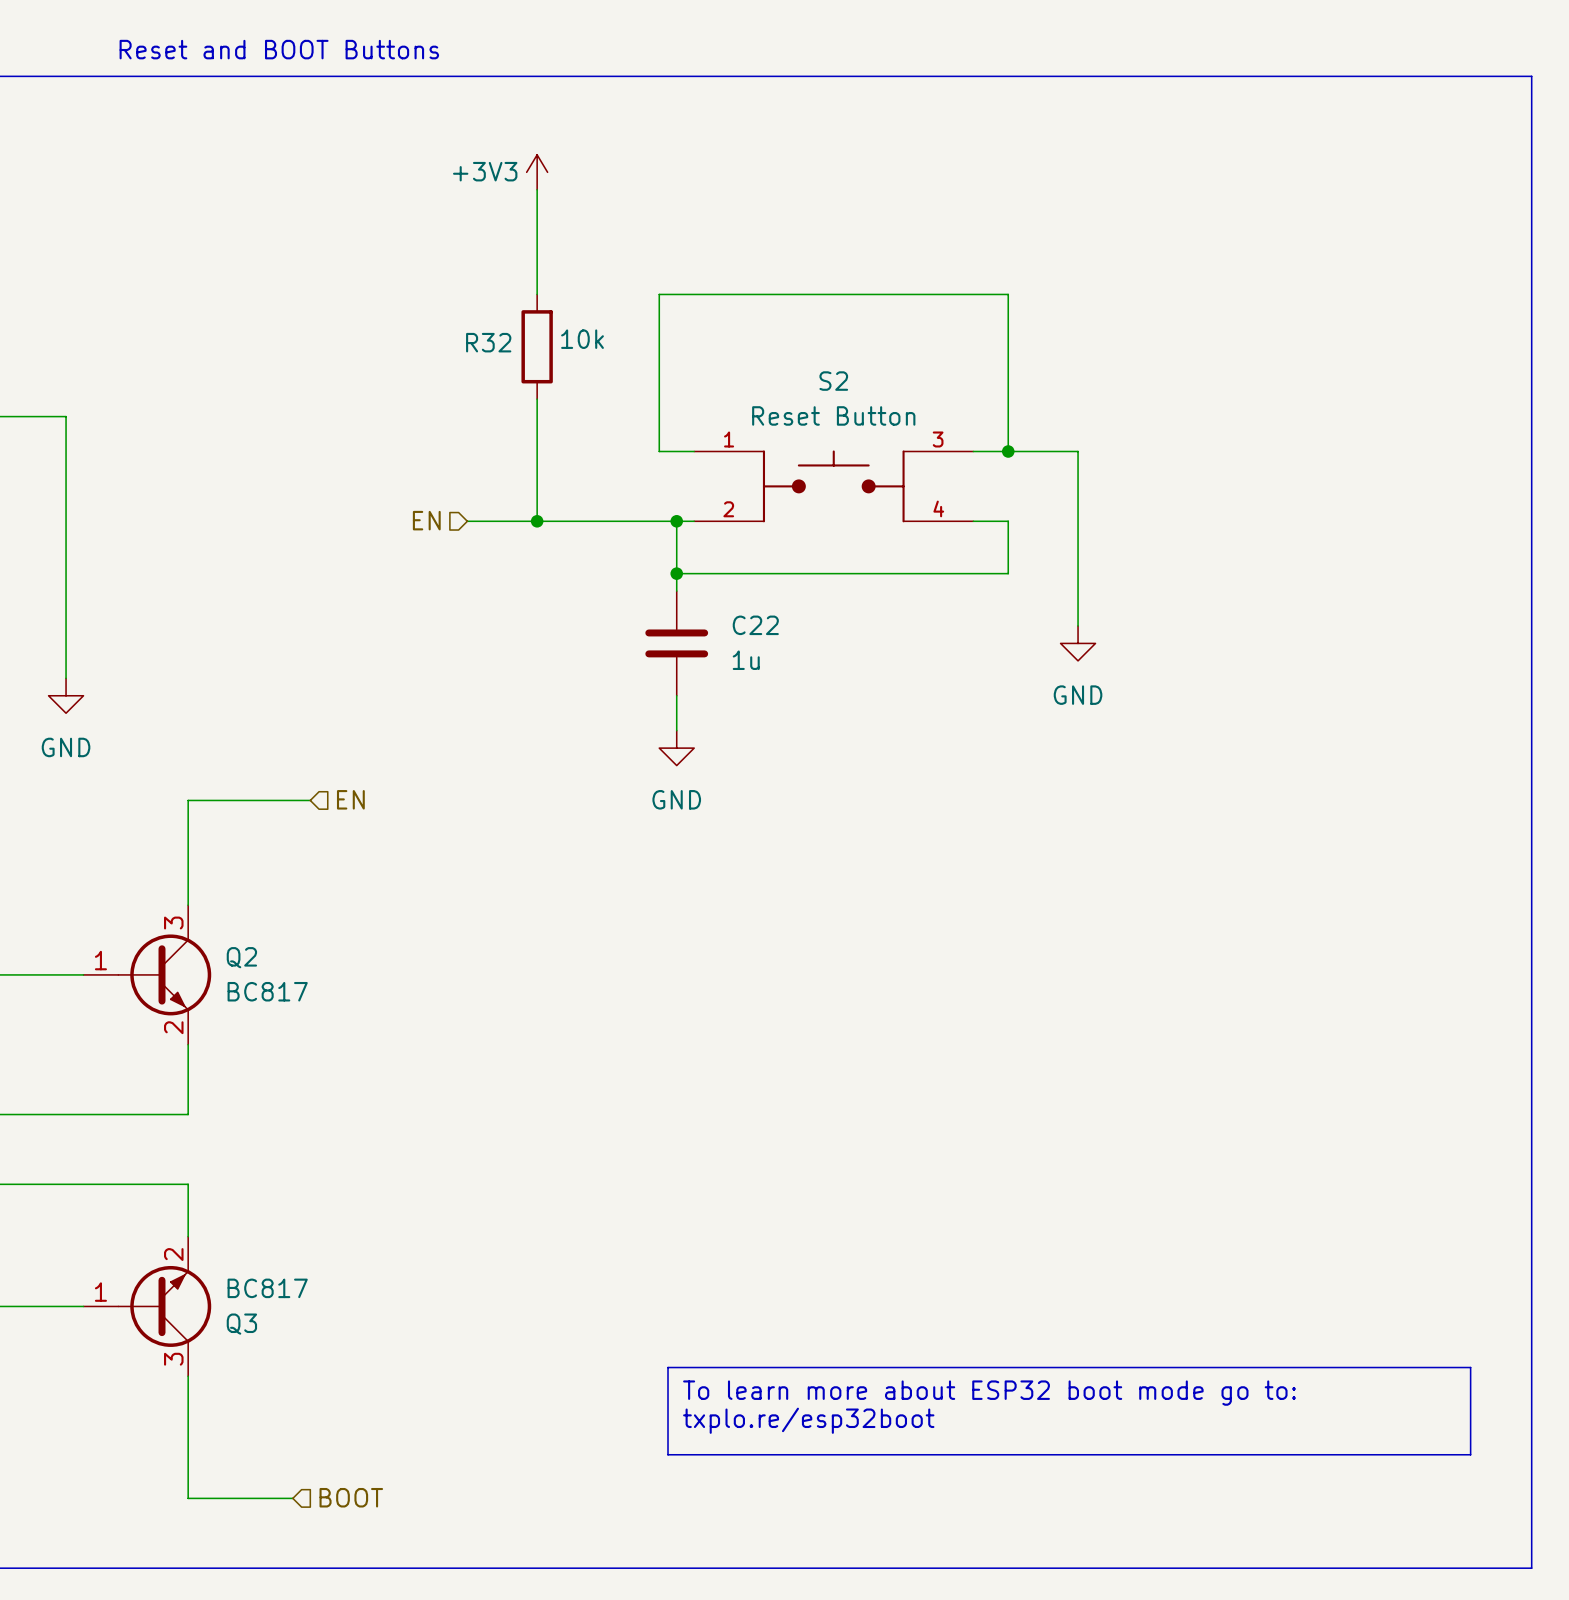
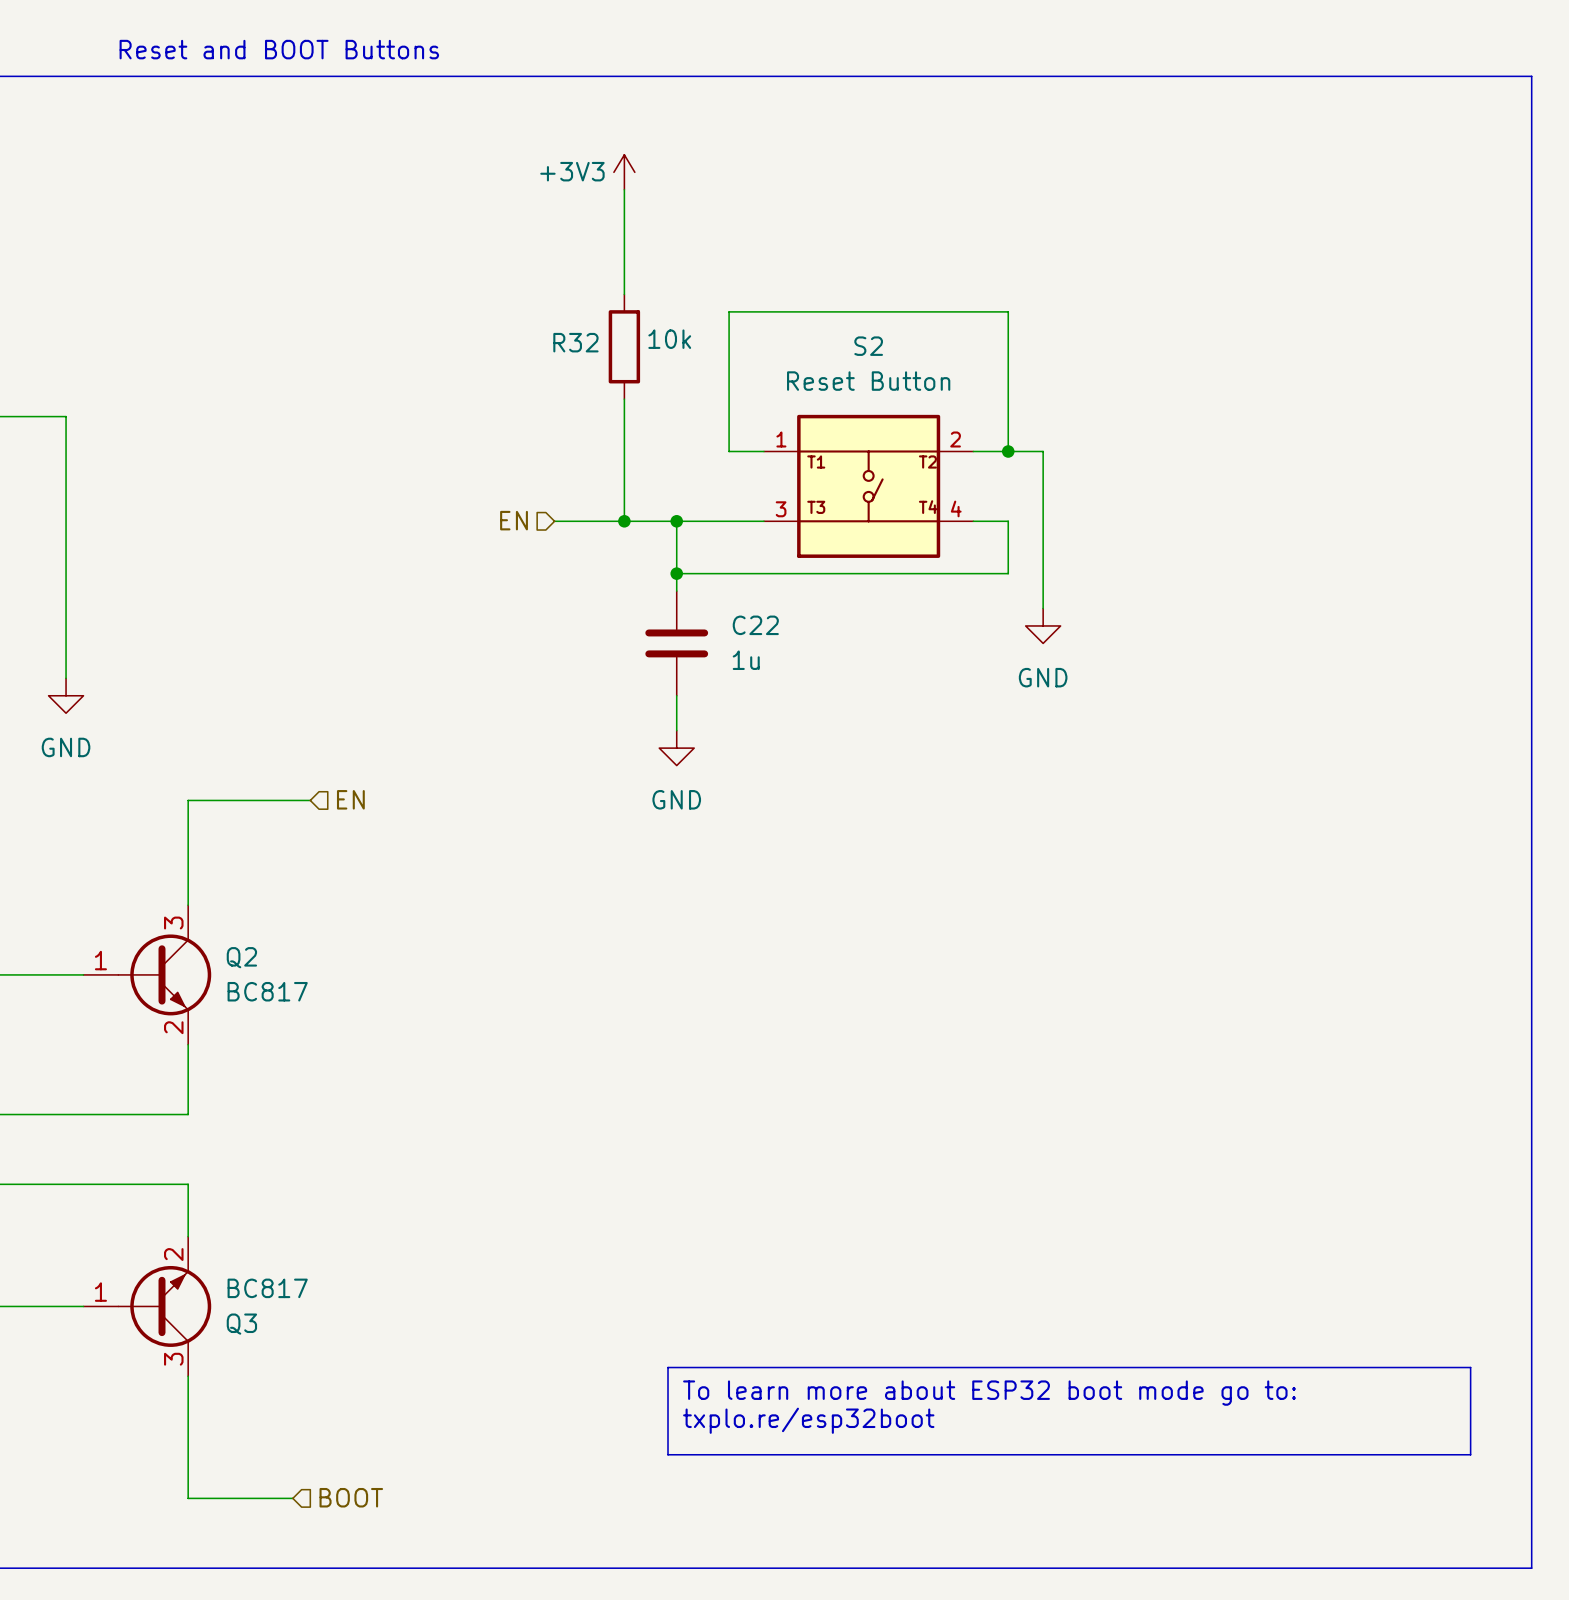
power symbol position: +3V3 (537, 172) -> +3V3 (624, 172)
wire: (537, 189) (537, 294) -> (624, 189) (624, 294)
wire: (1008, 311) (1008, 294) (659, 294) (659, 451) (694, 451) -> (1008, 311) (729, 311) (729, 451) (763, 451)
R32 position: (537, 346) -> (624, 346)
S2 name position: S2 (833, 381) -> S2 (868, 346)
wire: (537, 399) (537, 521) -> (624, 399) (624, 521)
S2 value position: Reset Button (833, 415) -> Reset Button (868, 381)
S2 symbol: [694, 450, 974, 523] -> [763, 414, 974, 558]
wire: (1043, 451) (1078, 451) (1078, 625) -> (1043, 451) (1043, 608)
hierarchical label position: EN (426, 520) -> EN (514, 520)
wire: (467, 521) (554, 521) -> none
junction: (537, 521) -> none
junction: none -> (624, 521)
power symbol position: GND (1078, 643) -> GND (1043, 625)

